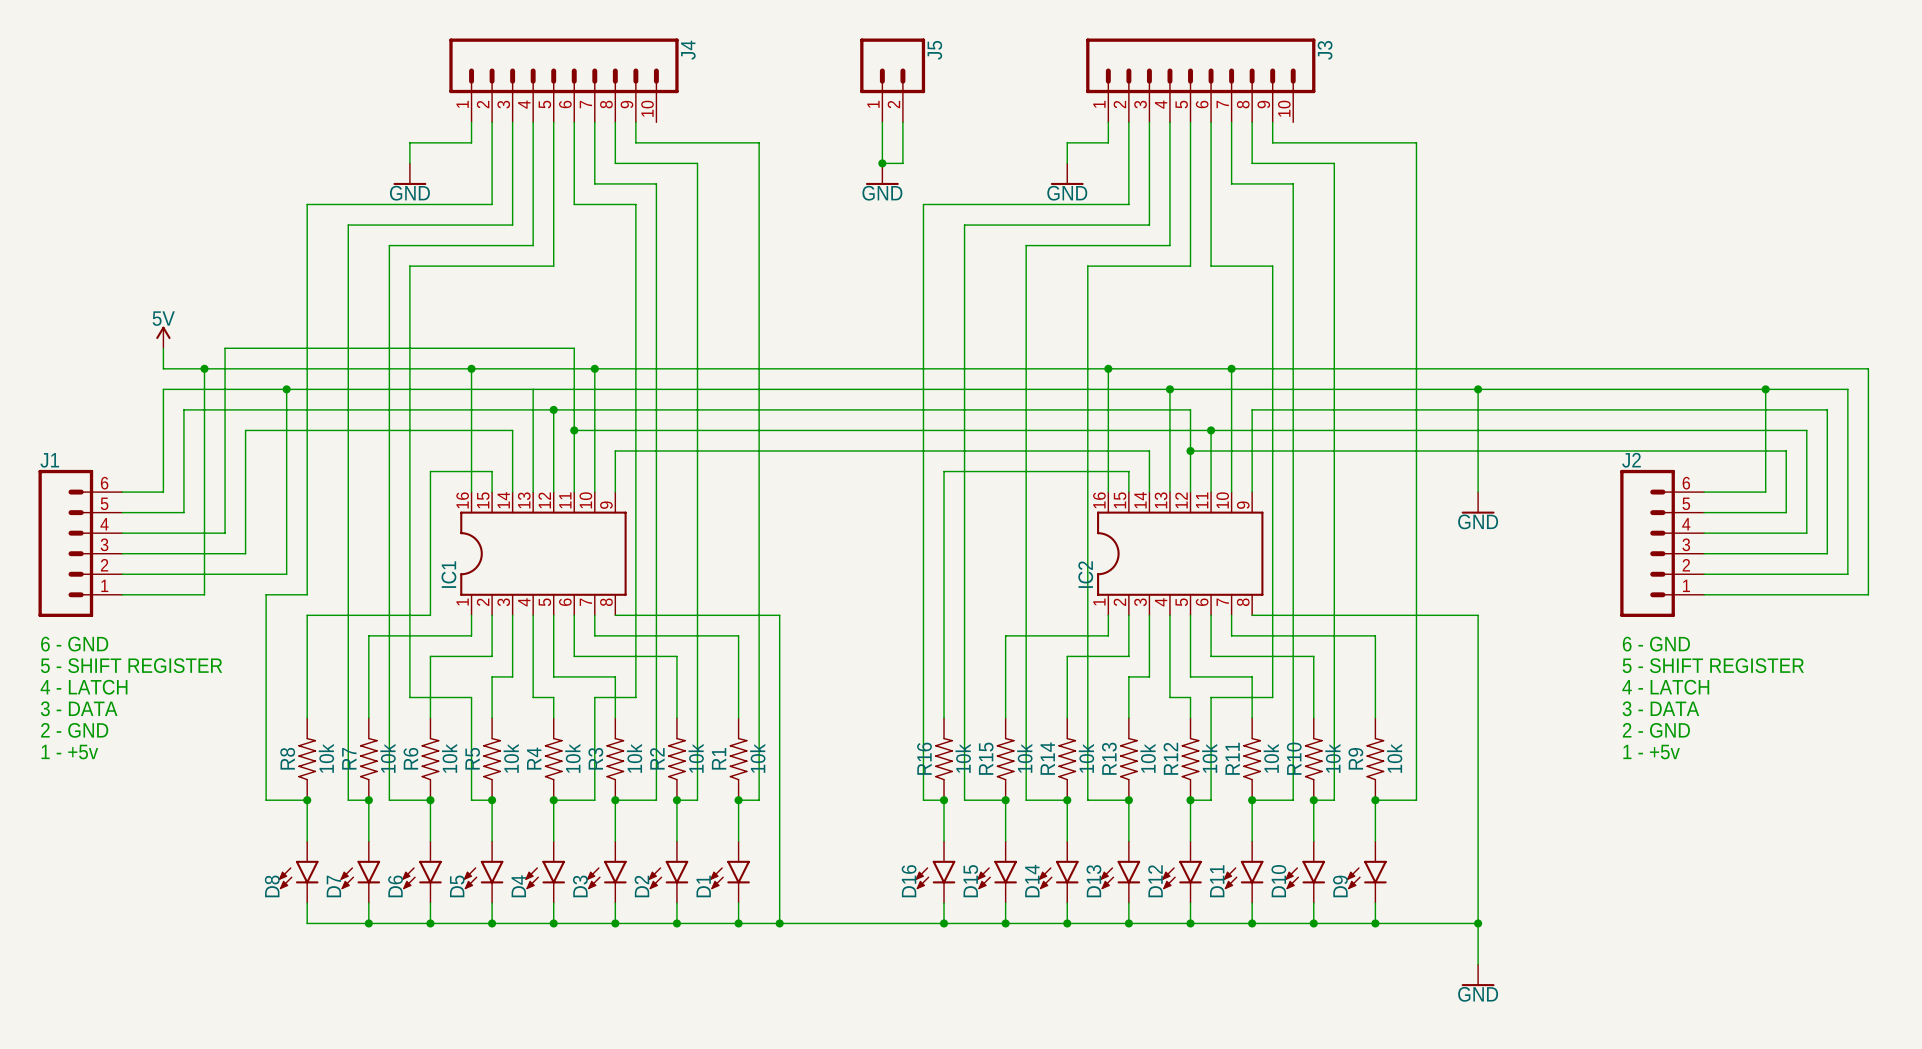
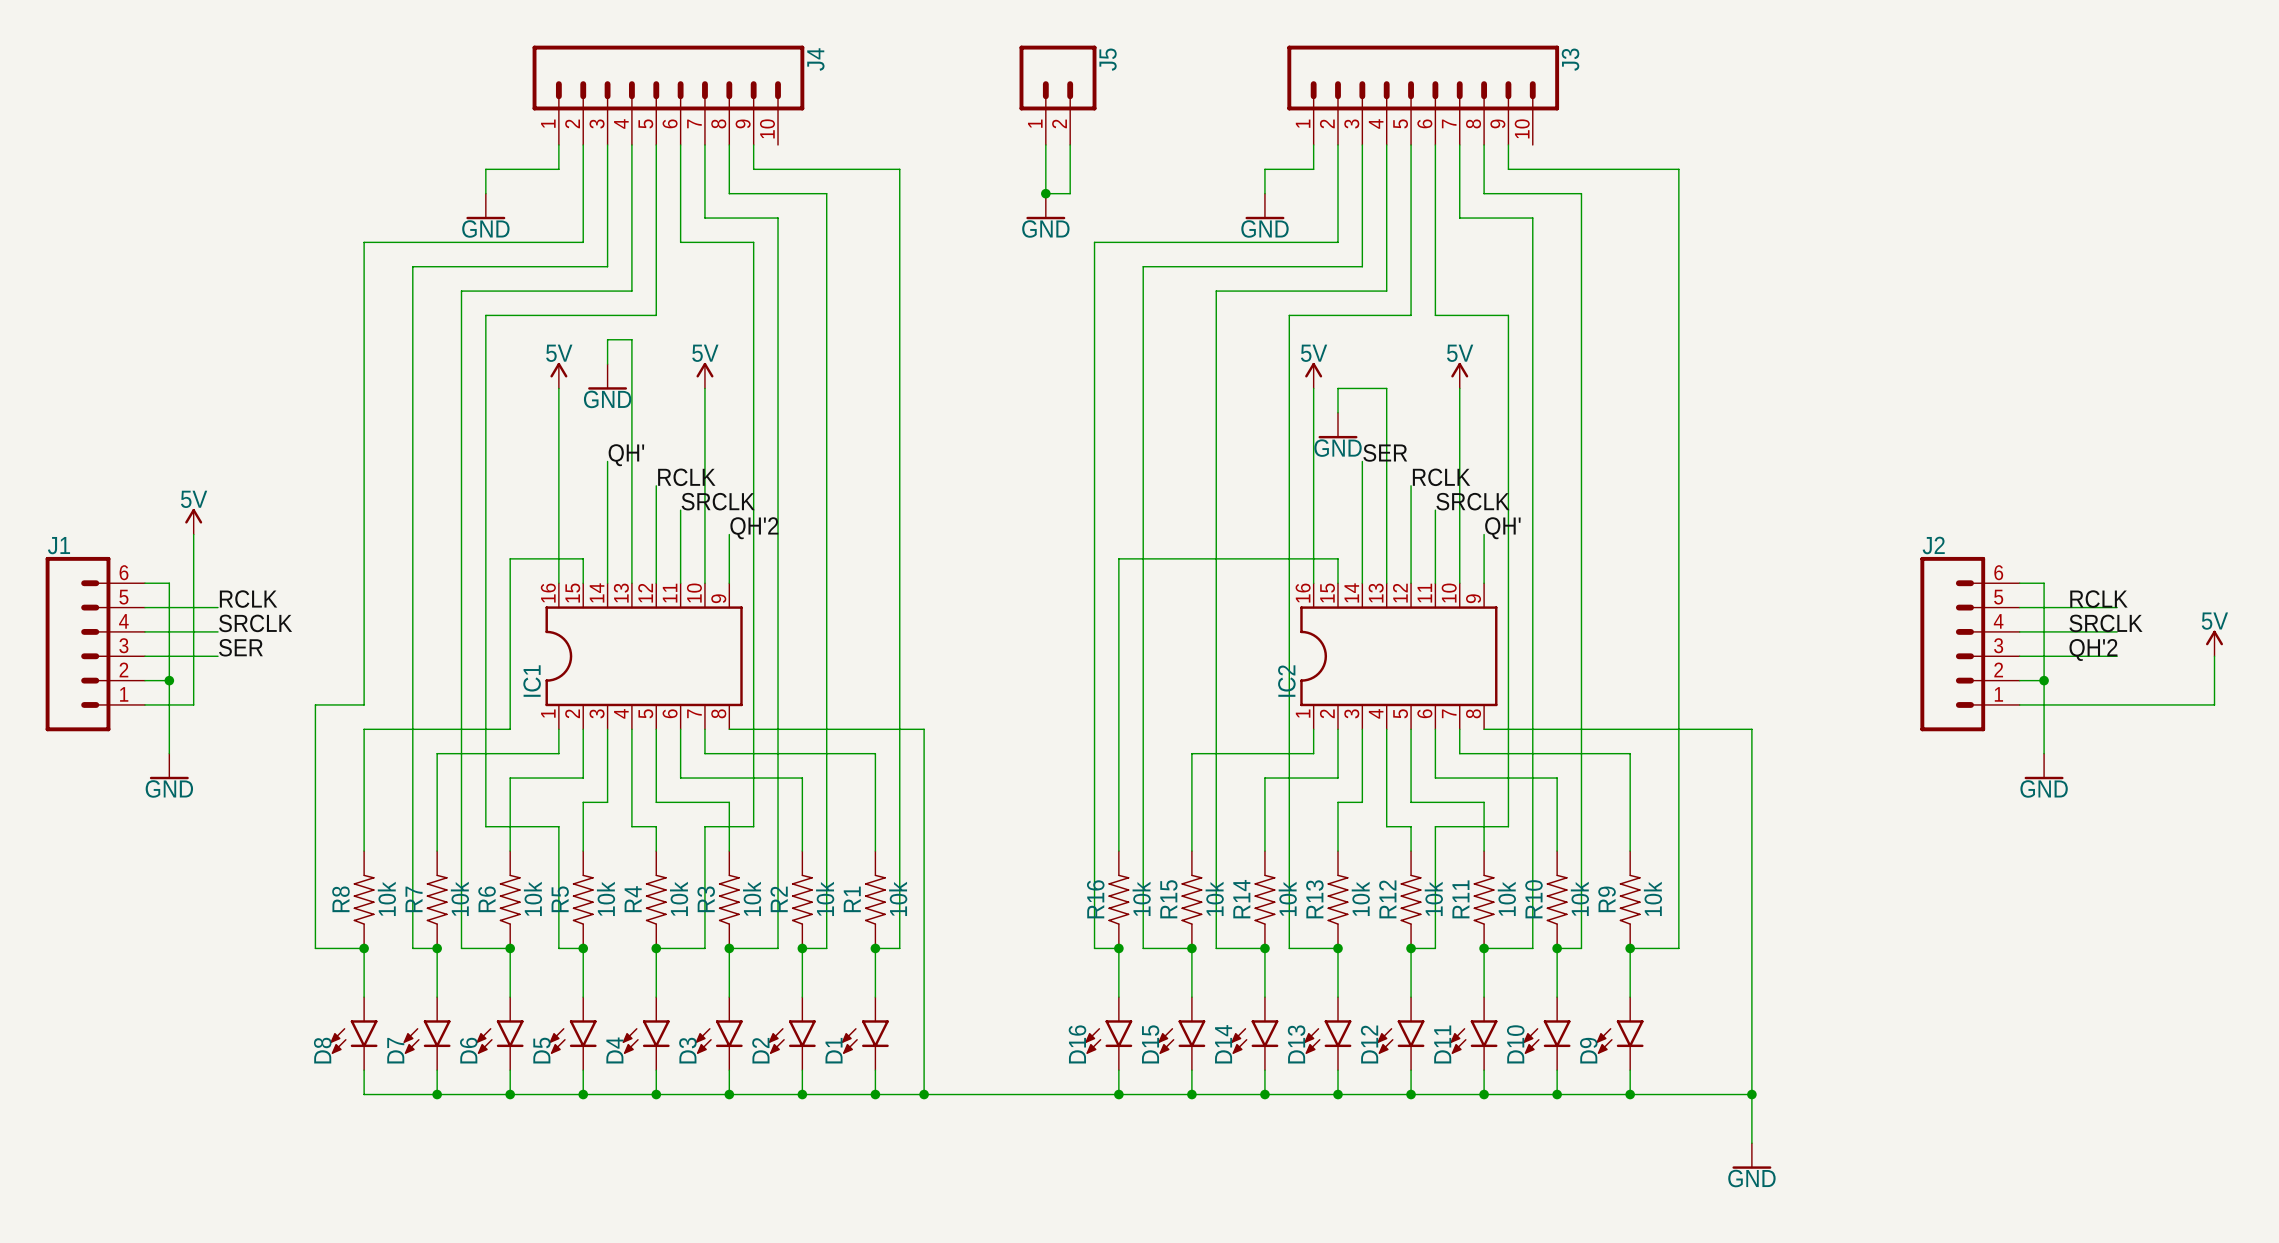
wire: none -> (607, 364) (607, 339) (631, 339) (631, 461)
power symbol: none -> 5V (558, 375)
power symbol: none -> 5V (704, 375)
power symbol: none -> 5V (1313, 375)
power symbol: none -> 5V (1459, 375)
power symbol: none -> GND (607, 376)
wire: none -> (558, 388) (558, 437)
wire: none -> (704, 388) (704, 437)
wire: none -> (1313, 388) (1313, 437)
wire: none -> (1459, 388) (1459, 437)
power symbol position: 5V (163, 337) -> 5V (193, 521)
wire: (163, 348) (163, 368) (1868, 368) (1868, 553) -> none
wire: none -> (1338, 412) (1338, 388) (1386, 388) (1386, 461)
power symbol: none -> GND (1338, 425)
wire: (204, 368) (204, 594) (163, 594) -> none
junction: (204, 368) -> none
junction: (471, 368) -> none
junction: (594, 368) -> none
junction: (1108, 368) -> none
junction: (1231, 368) -> none
label: none -> SER (1385, 452)
label: none -> QH' (626, 455)
wire: (286, 389) (286, 574) (142, 574) -> none
junction: (286, 389) -> none
junction: (1169, 389) -> none
wire: (1478, 389) (1478, 492) -> none
junction: (1478, 389) -> none
wire: (1765, 389) (1765, 492) (1724, 492) -> (2044, 753) (2044, 583)
junction: (1765, 389) -> none
label: none -> RCLK (686, 477)
label: none -> RCLK (1441, 477)
junction: (553, 409) -> none
wire: (1190, 409) (183, 409) (183, 512) -> none
label: none -> SRCLK (718, 501)
label: none -> SRCLK (1472, 501)
wire: (512, 430) (245, 430) (245, 553) (183, 553) -> (607, 510) (607, 461)
junction: (574, 430) -> none
junction: (1211, 430) -> none
label: none -> QH'2 (754, 528)
label: none -> QH' (1502, 528)
wire: (163, 450) (163, 389) (1847, 389) (1847, 574) (1724, 574) -> none
wire: (615, 450) (1149, 450) -> (1362, 461) (1362, 534)
wire: (1190, 450) (1786, 450) (1786, 512) -> none
junction: (1190, 450) -> none
wire: (1252, 450) (1252, 409) (1827, 409) (1827, 553) (1786, 553) -> none
wire: (142, 492) (163, 492) -> (193, 704) (193, 583)
wire: none -> (169, 583) (169, 753)
power symbol: GND (1478, 502) -> none
label: none -> RCLK (248, 599)
label: none -> RCLK (2098, 599)
label: none -> SRCLK (255, 623)
label: none -> SRCLK (2105, 623)
wire: (183, 533) (225, 533) (225, 348) (574, 348) (574, 430) (1806, 430) (1806, 533) (1786, 533) -> none
power symbol: none -> 5V (2214, 643)
label: none -> SER (240, 647)
label: none -> QH'2 (2093, 649)
junction: none -> (169, 680)
junction: none -> (2044, 680)
text: 6 - GND (74, 644) -> none
text: 6 - GND (1656, 644) -> none
power symbol: none -> GND (169, 766)
power symbol: none -> GND (2044, 766)
text: 5 - SHIFT REGISTER (131, 665) -> none
text: 5 - SHIFT REGISTER (1713, 665) -> none
text: 4 - LATCH (84, 687) -> none
text: 4 - LATCH (1665, 687) -> none
text: 3 - DATA (79, 708) -> none
text: 3 - DATA (1660, 708) -> none
text: 2 - GND (74, 730) -> none
text: 2 - GND (1656, 730) -> none
text: 1 - +5v (69, 752) -> none
text: 1 - +5v (1651, 752) -> none

